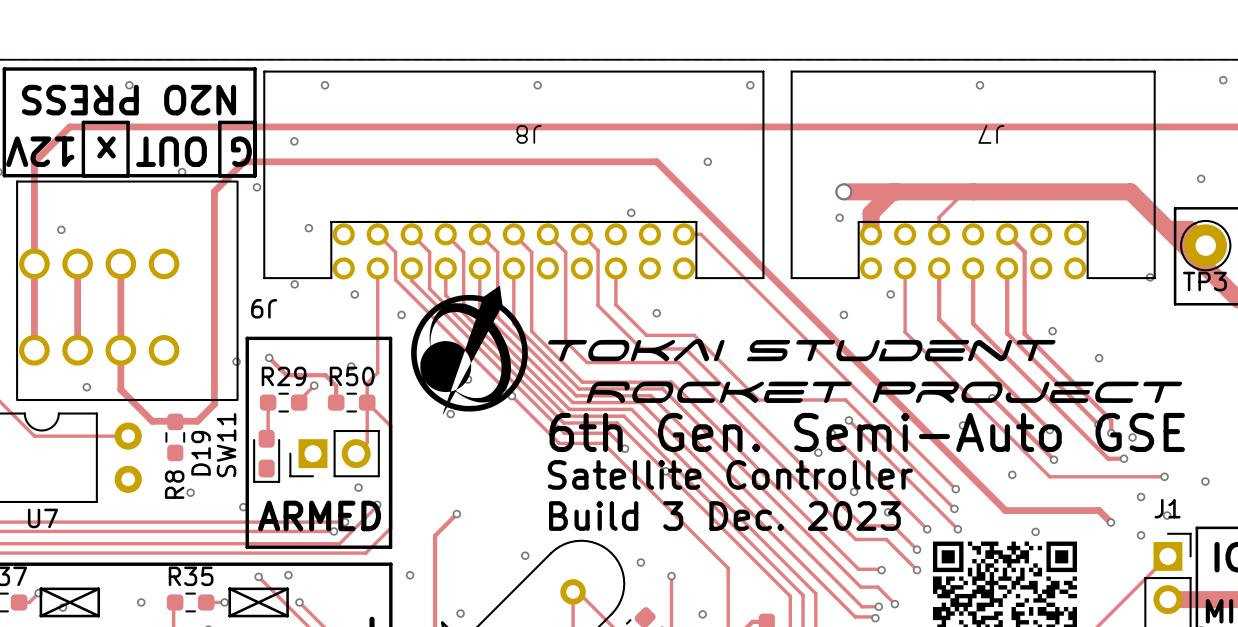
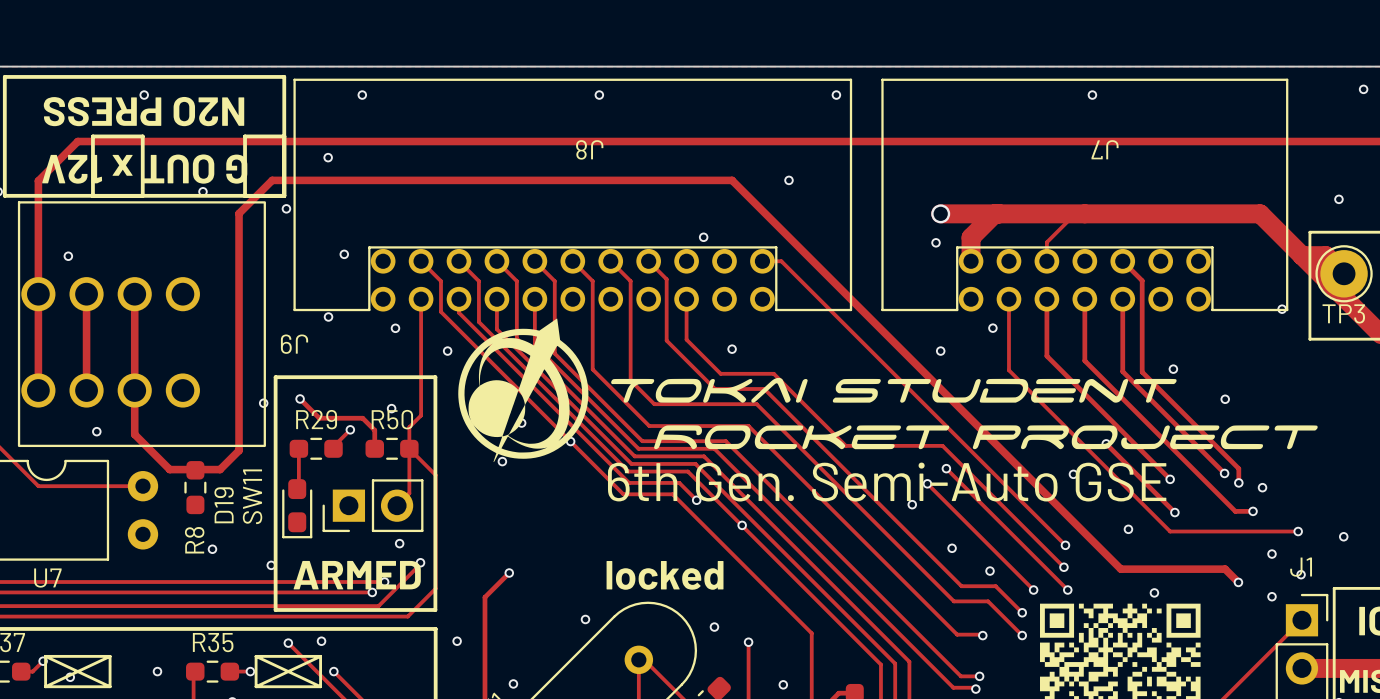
track: (513, 268) (513, 323) (579, 388) (662, 388) (860, 587) (877, 587) (894, 604) -> none
text: Satellite Controller (730, 474) -> none
text: Build 3 Dec. 2023 (724, 516) -> locked (665, 575)
via: (894, 604) -> none

